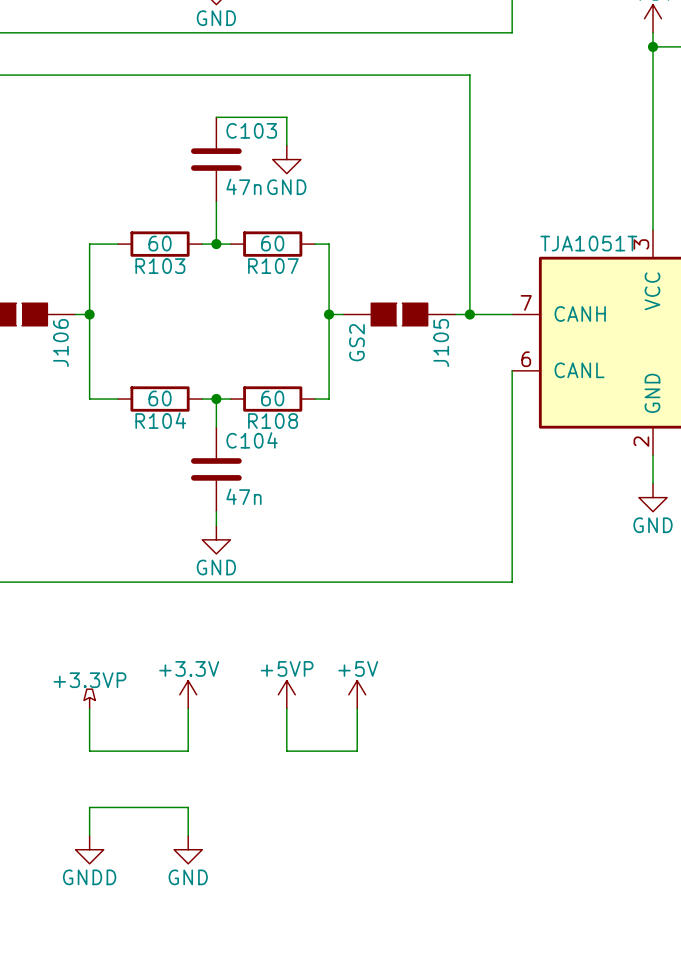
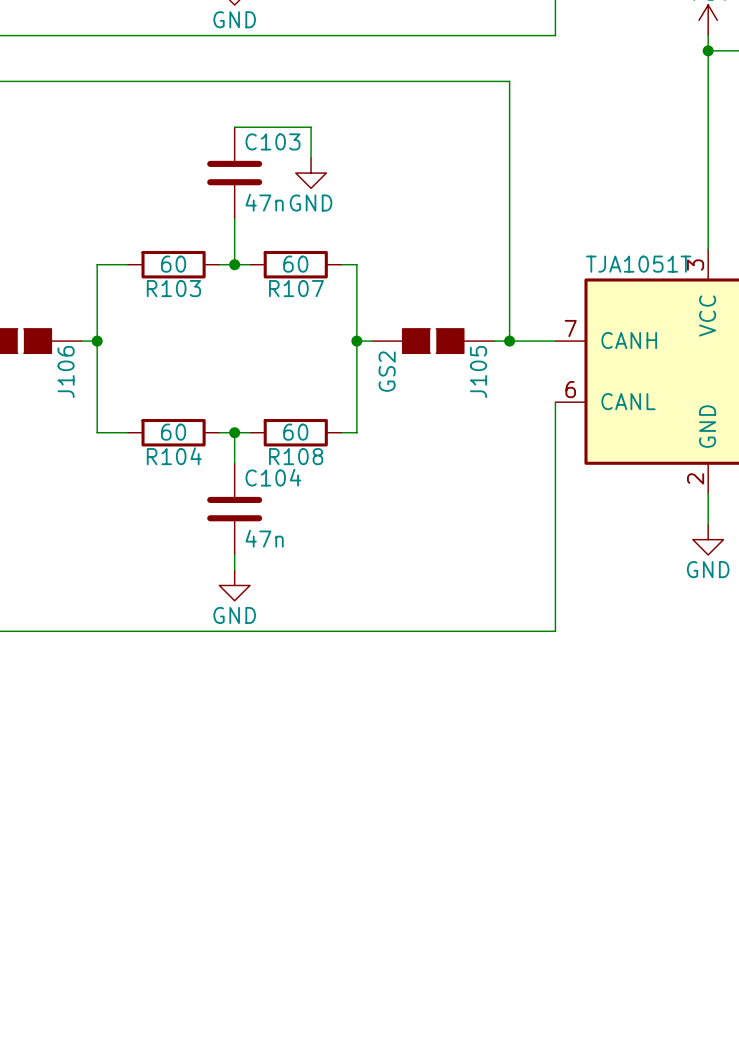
power symbol: +3.3V (188, 694) -> none
power symbol: +5VP (286, 694) -> none
power symbol: +5V (357, 694) -> none
power symbol: +3.3VP (89, 699) -> none
wire: (89, 708) (89, 751) (188, 751) (188, 708) -> none
wire: (286, 708) (286, 751) (357, 751) (357, 708) -> none
wire: (89, 835) (89, 807) (188, 807) (188, 835) -> none
power symbol: GNDD (89, 849) -> none
power symbol: GND (188, 849) -> none

